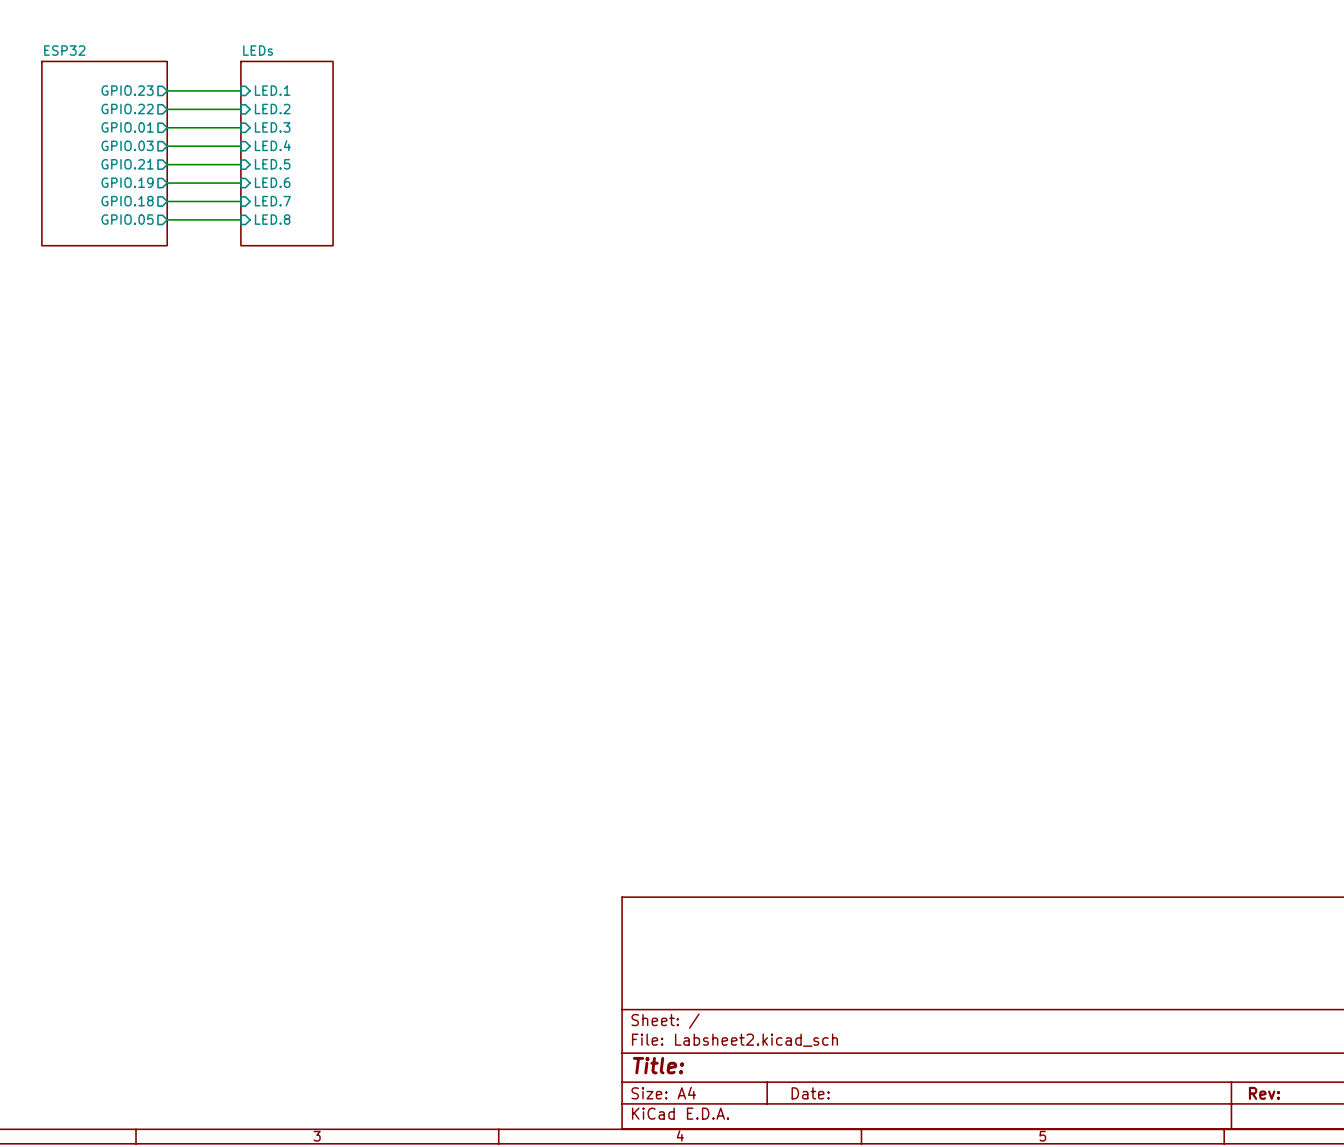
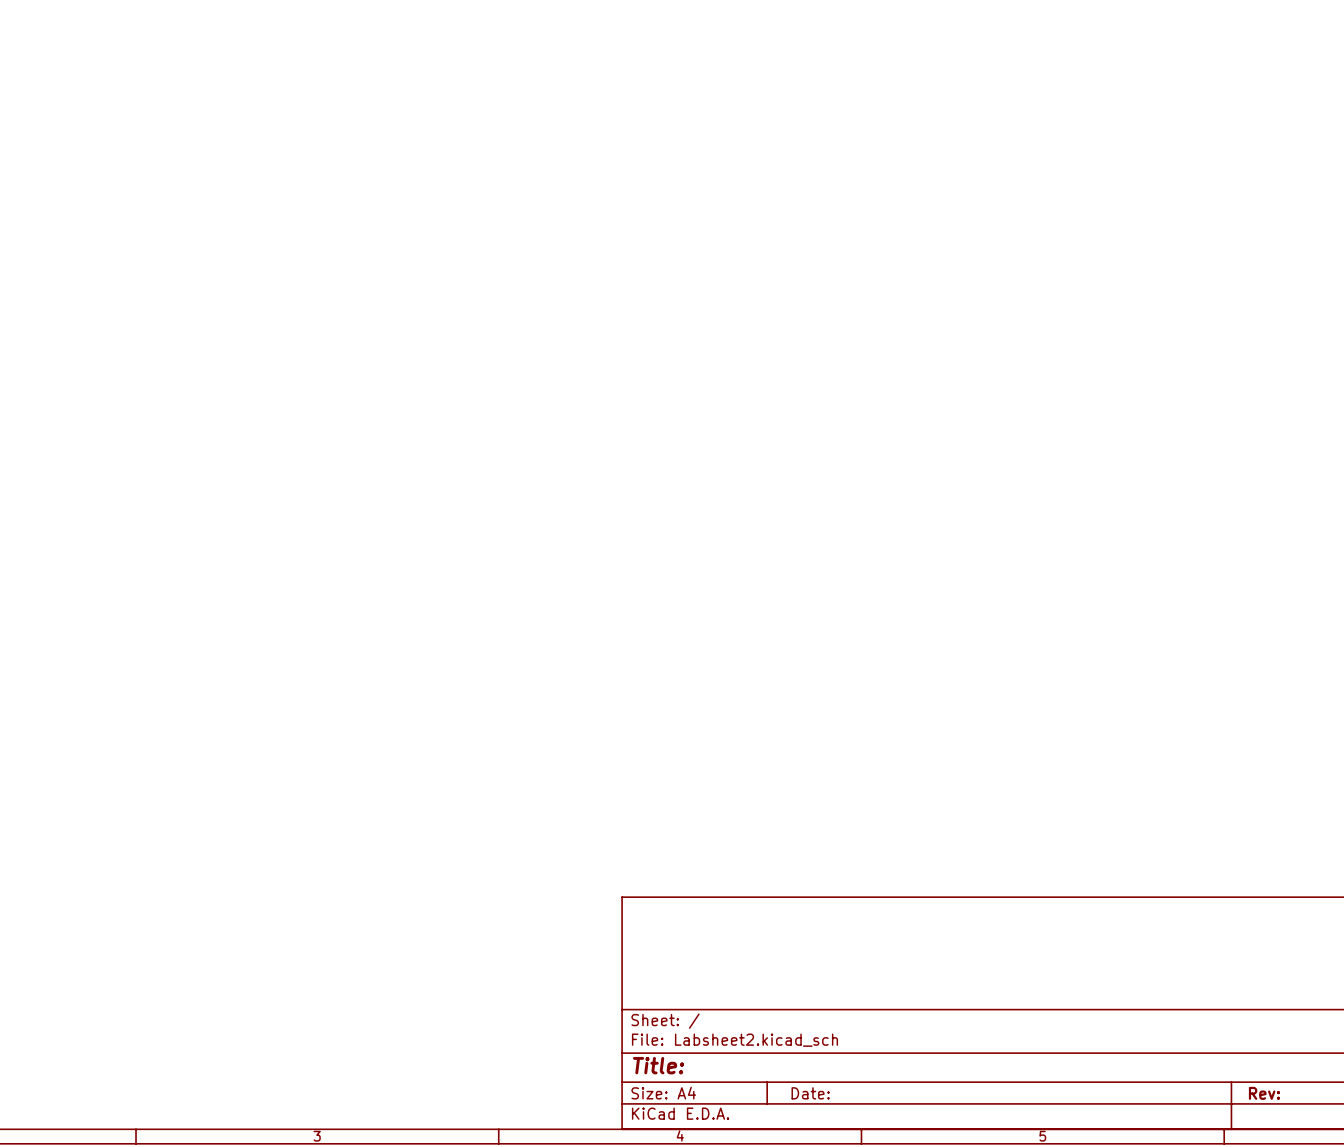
sheet pin: GPIO.23 (127, 90) -> none
wire: (167, 90) (240, 90) -> none
sheet pin: LED.1 (272, 90) -> none
sheet pin: GPIO.22 (127, 109) -> none
wire: (167, 109) (240, 109) -> none
sheet pin: LED.2 (272, 109) -> none
sheet pin: GPIO.01 (127, 127) -> none
wire: (167, 127) (240, 127) -> none
sheet pin: LED.3 (272, 127) -> none
sheet pin: GPIO.03 (127, 145) -> none
sheet pin: LED.4 (272, 145) -> none
wire: (167, 146) (240, 146) -> none
sheet ESP32: (104, 153) -> none
sheet LEDs: (286, 153) -> none
sheet pin: GPIO.21 (127, 164) -> none
wire: (167, 164) (240, 164) -> none
sheet pin: LED.5 (272, 164) -> none
sheet pin: GPIO.19 (127, 182) -> none
sheet pin: LED.6 (272, 182) -> none
wire: (167, 183) (240, 183) -> none
sheet pin: GPIO.18 (127, 201) -> none
wire: (167, 201) (240, 201) -> none
sheet pin: LED.7 (272, 201) -> none
sheet pin: GPIO.05 (127, 219) -> none
wire: (167, 219) (240, 219) -> none
sheet pin: LED.8 (272, 219) -> none

